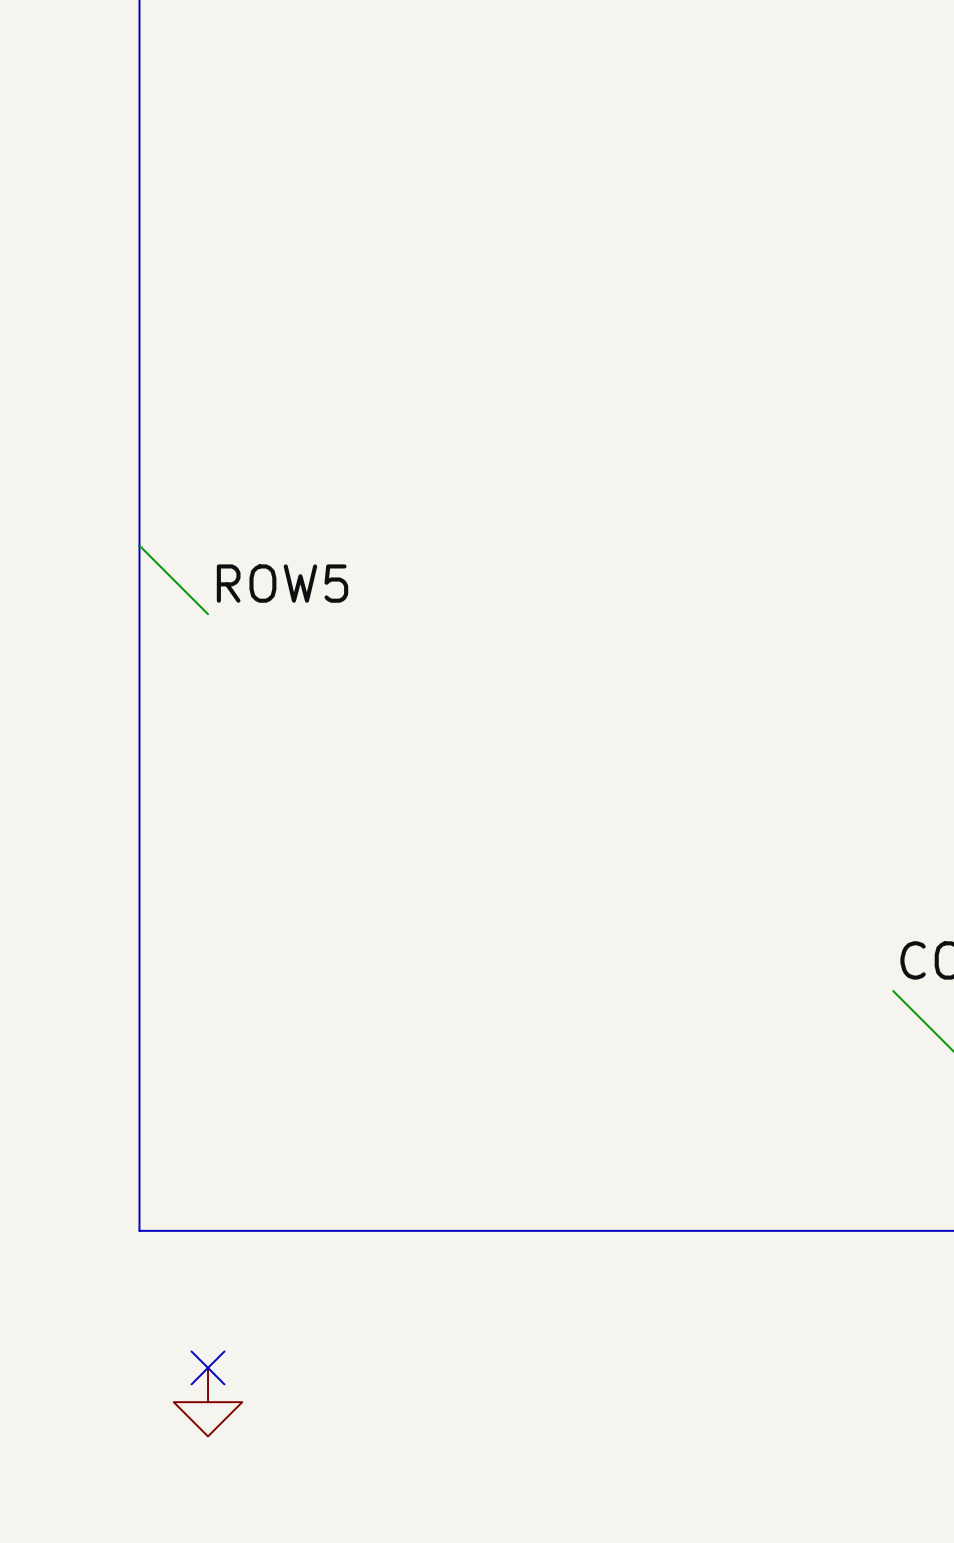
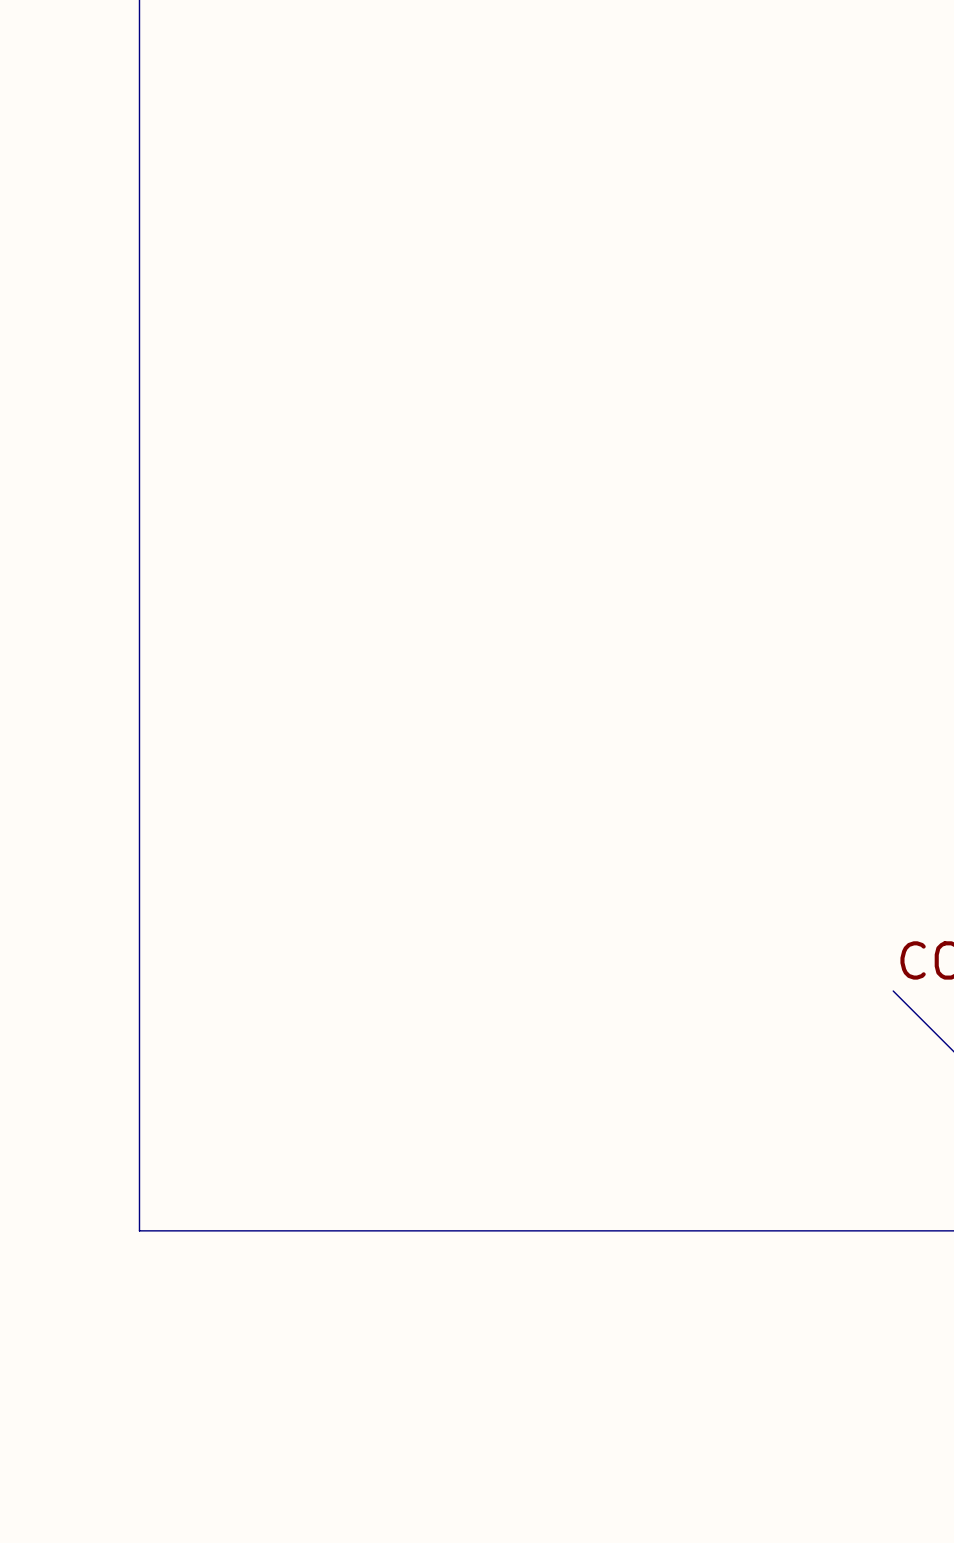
wire: (139, 545) (208, 614) -> none
label: ROW5 (282, 583) -> none
no-connect mark: (208, 1367) -> none
power symbol: (208, 1402) -> none

